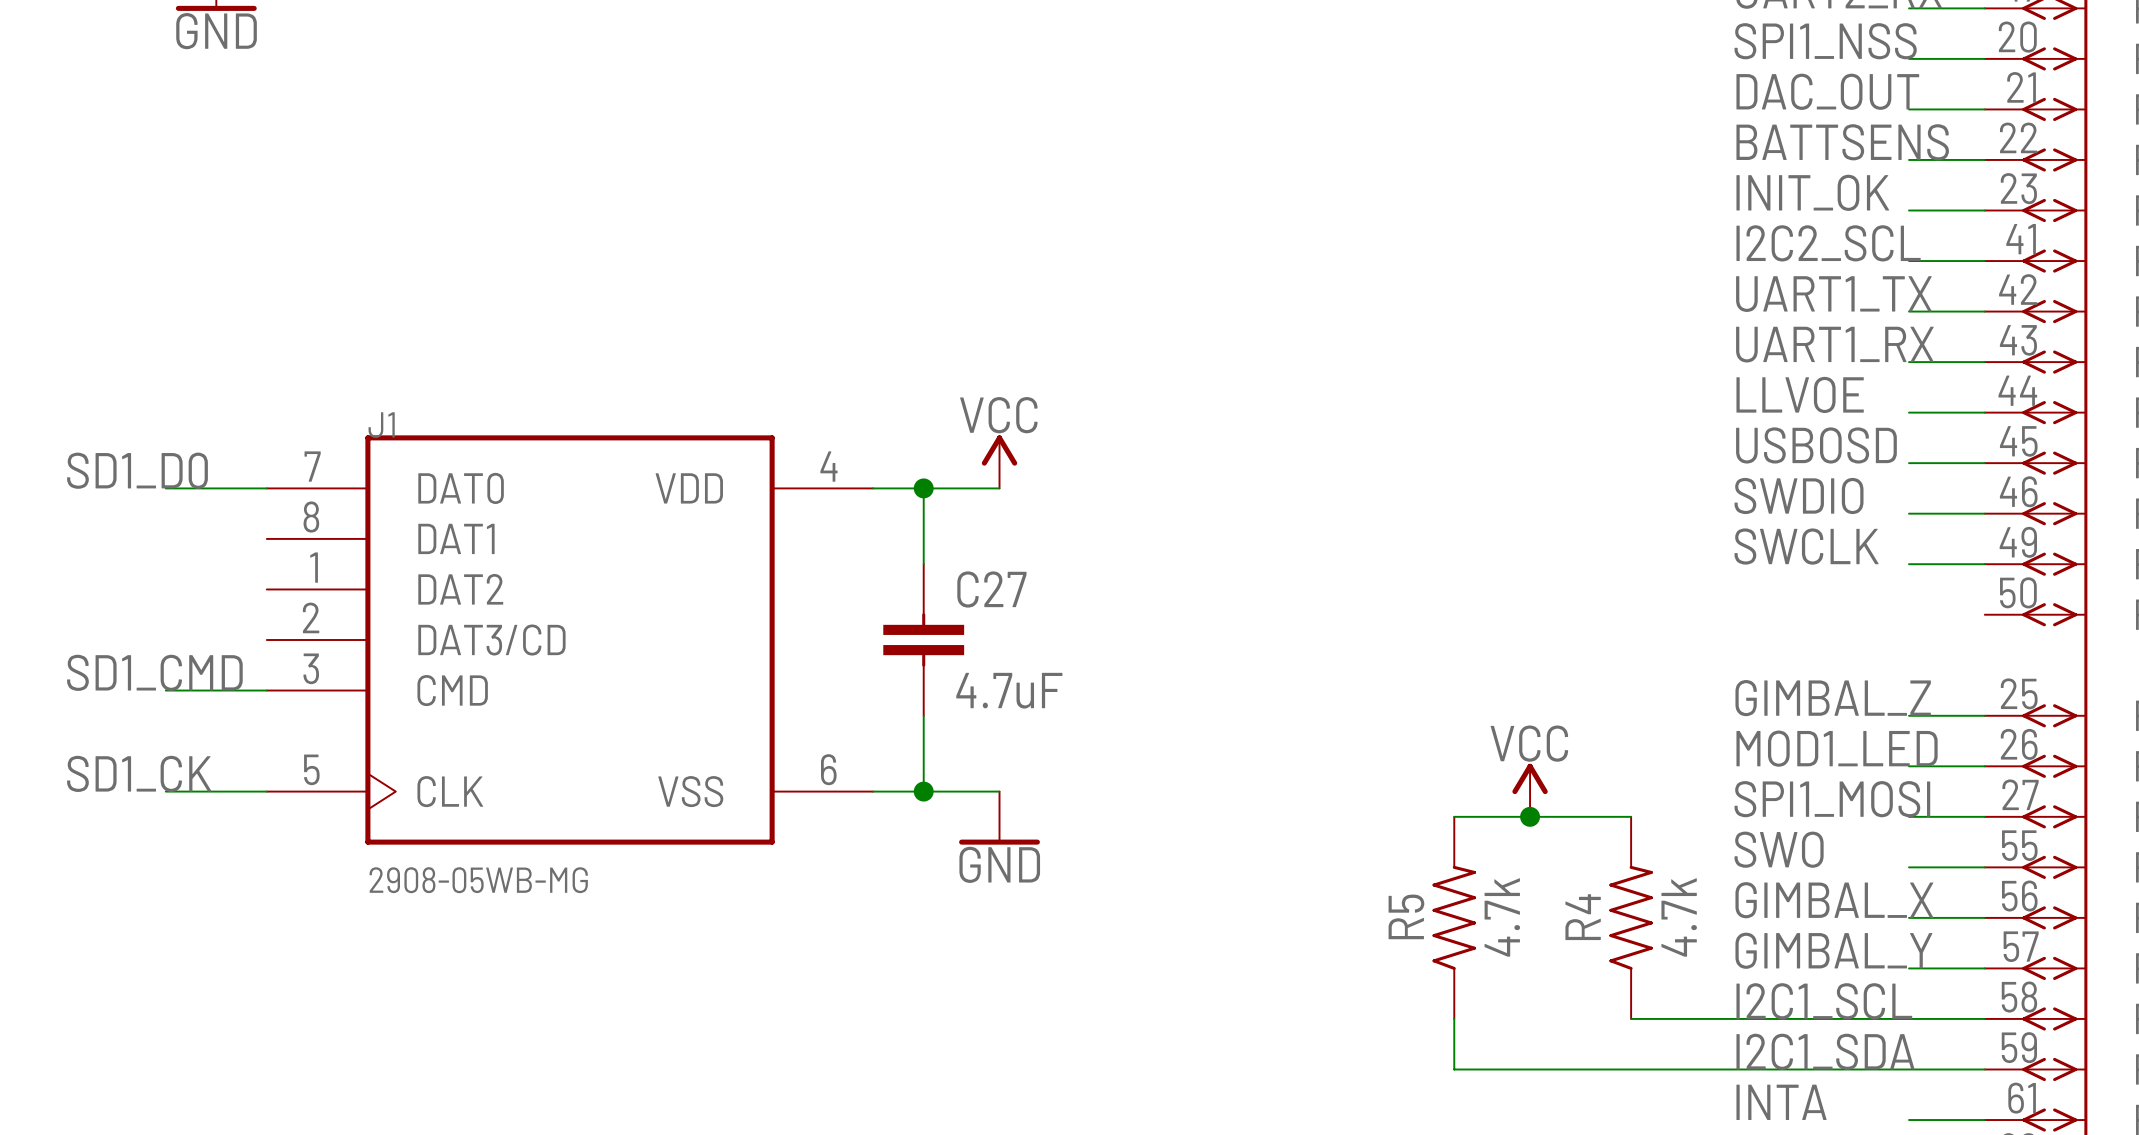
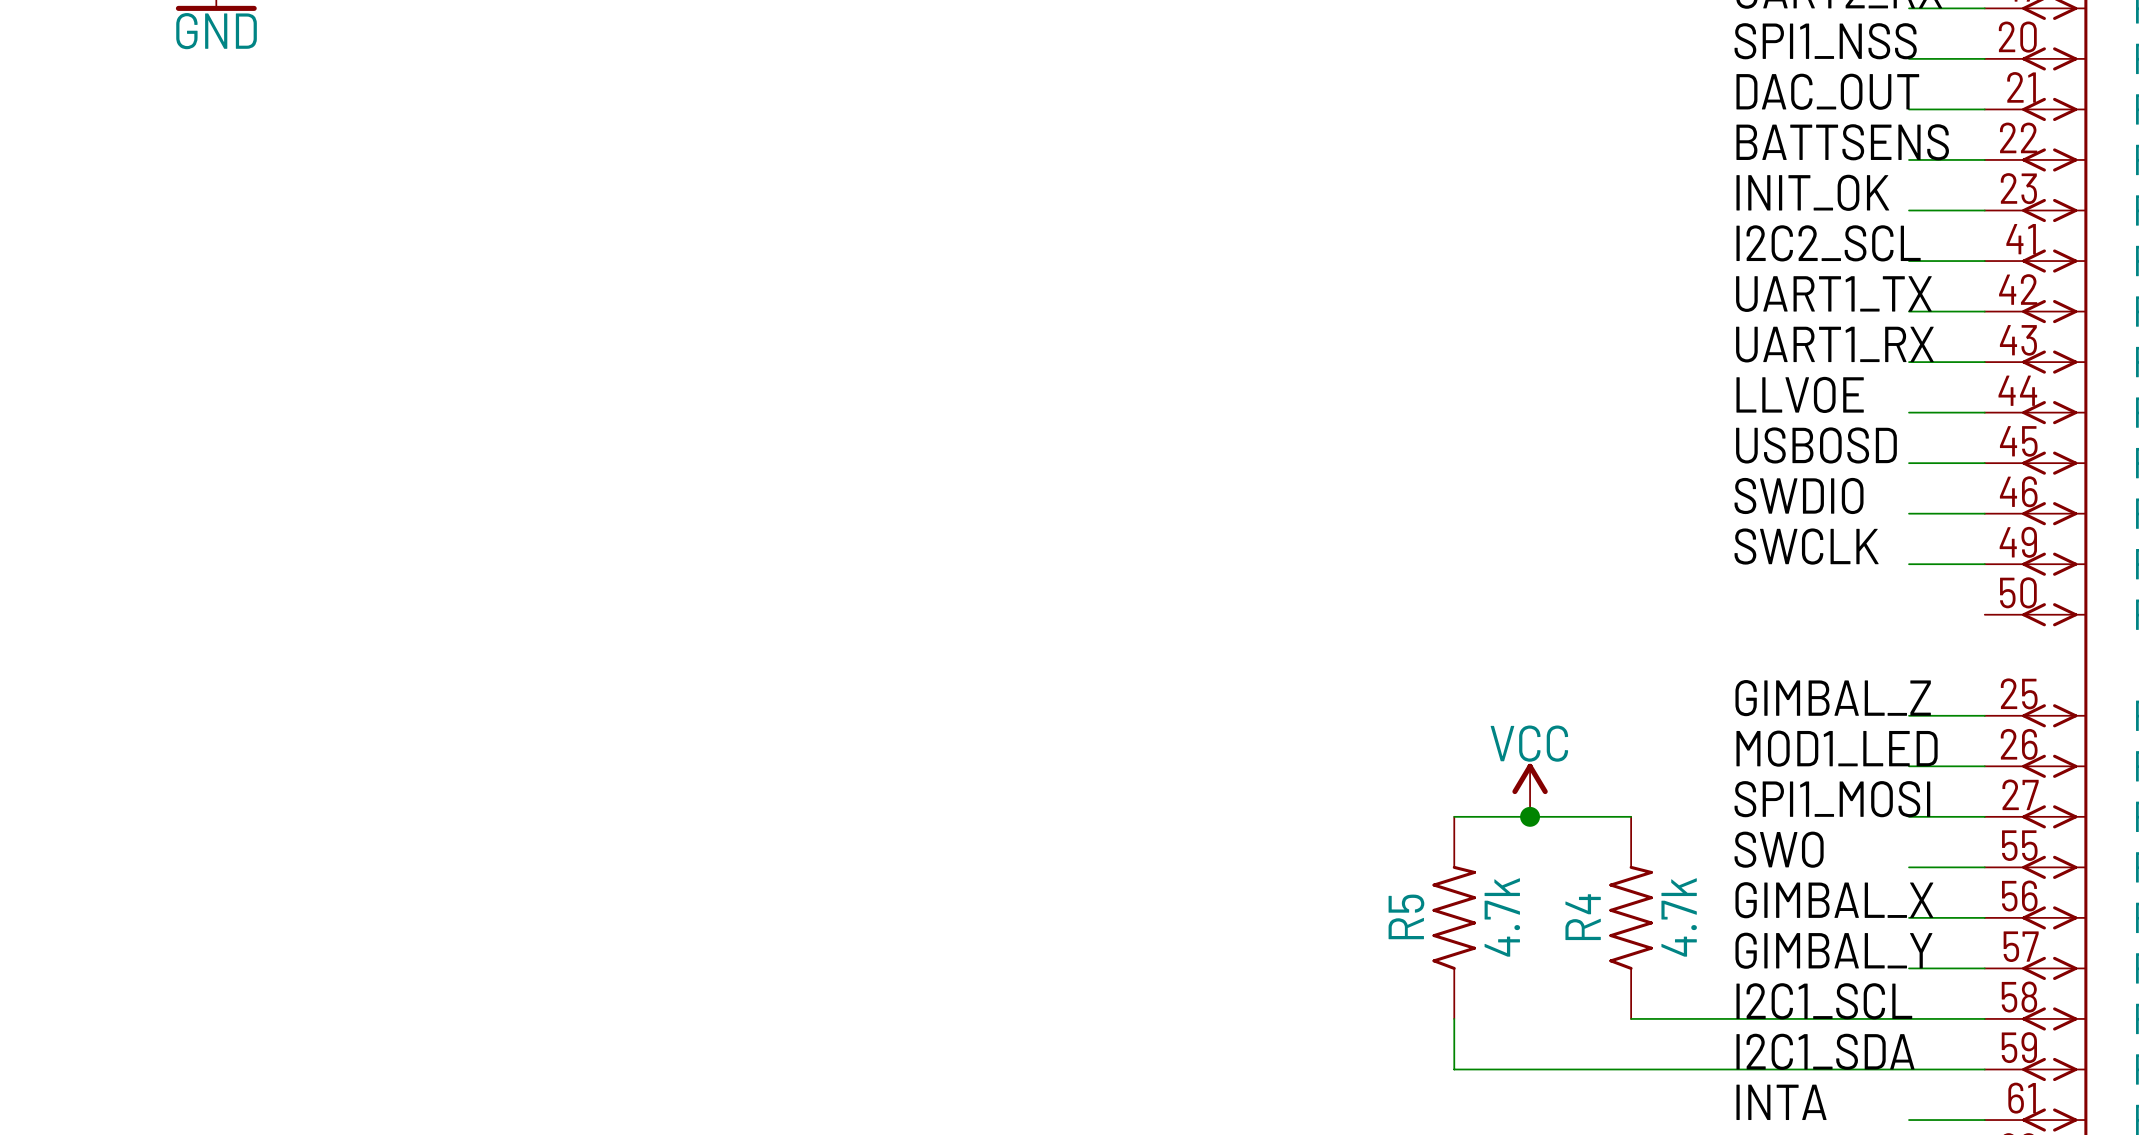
power symbol: VCC (999, 461) -> none
label: SD1_D0 (137, 470) -> none
wire: (165, 488) (266, 488) -> none
wire: (873, 488) (999, 488) -> none
wire: (923, 488) (923, 564) -> none
junction: (923, 488) -> none
J1: 2908-05WB-MG (570, 639) -> none
C27: 4.7uF (923, 639) -> none
label: SD1_CMD (154, 672) -> none
wire: (165, 690) (266, 690) -> none
wire: (923, 715) (923, 791) -> none
label: SD1_CK (139, 773) -> none
wire: (165, 791) (266, 791) -> none
wire: (873, 791) (999, 791) -> none
junction: (923, 791) -> none
power symbol: GND (999, 818) -> none

